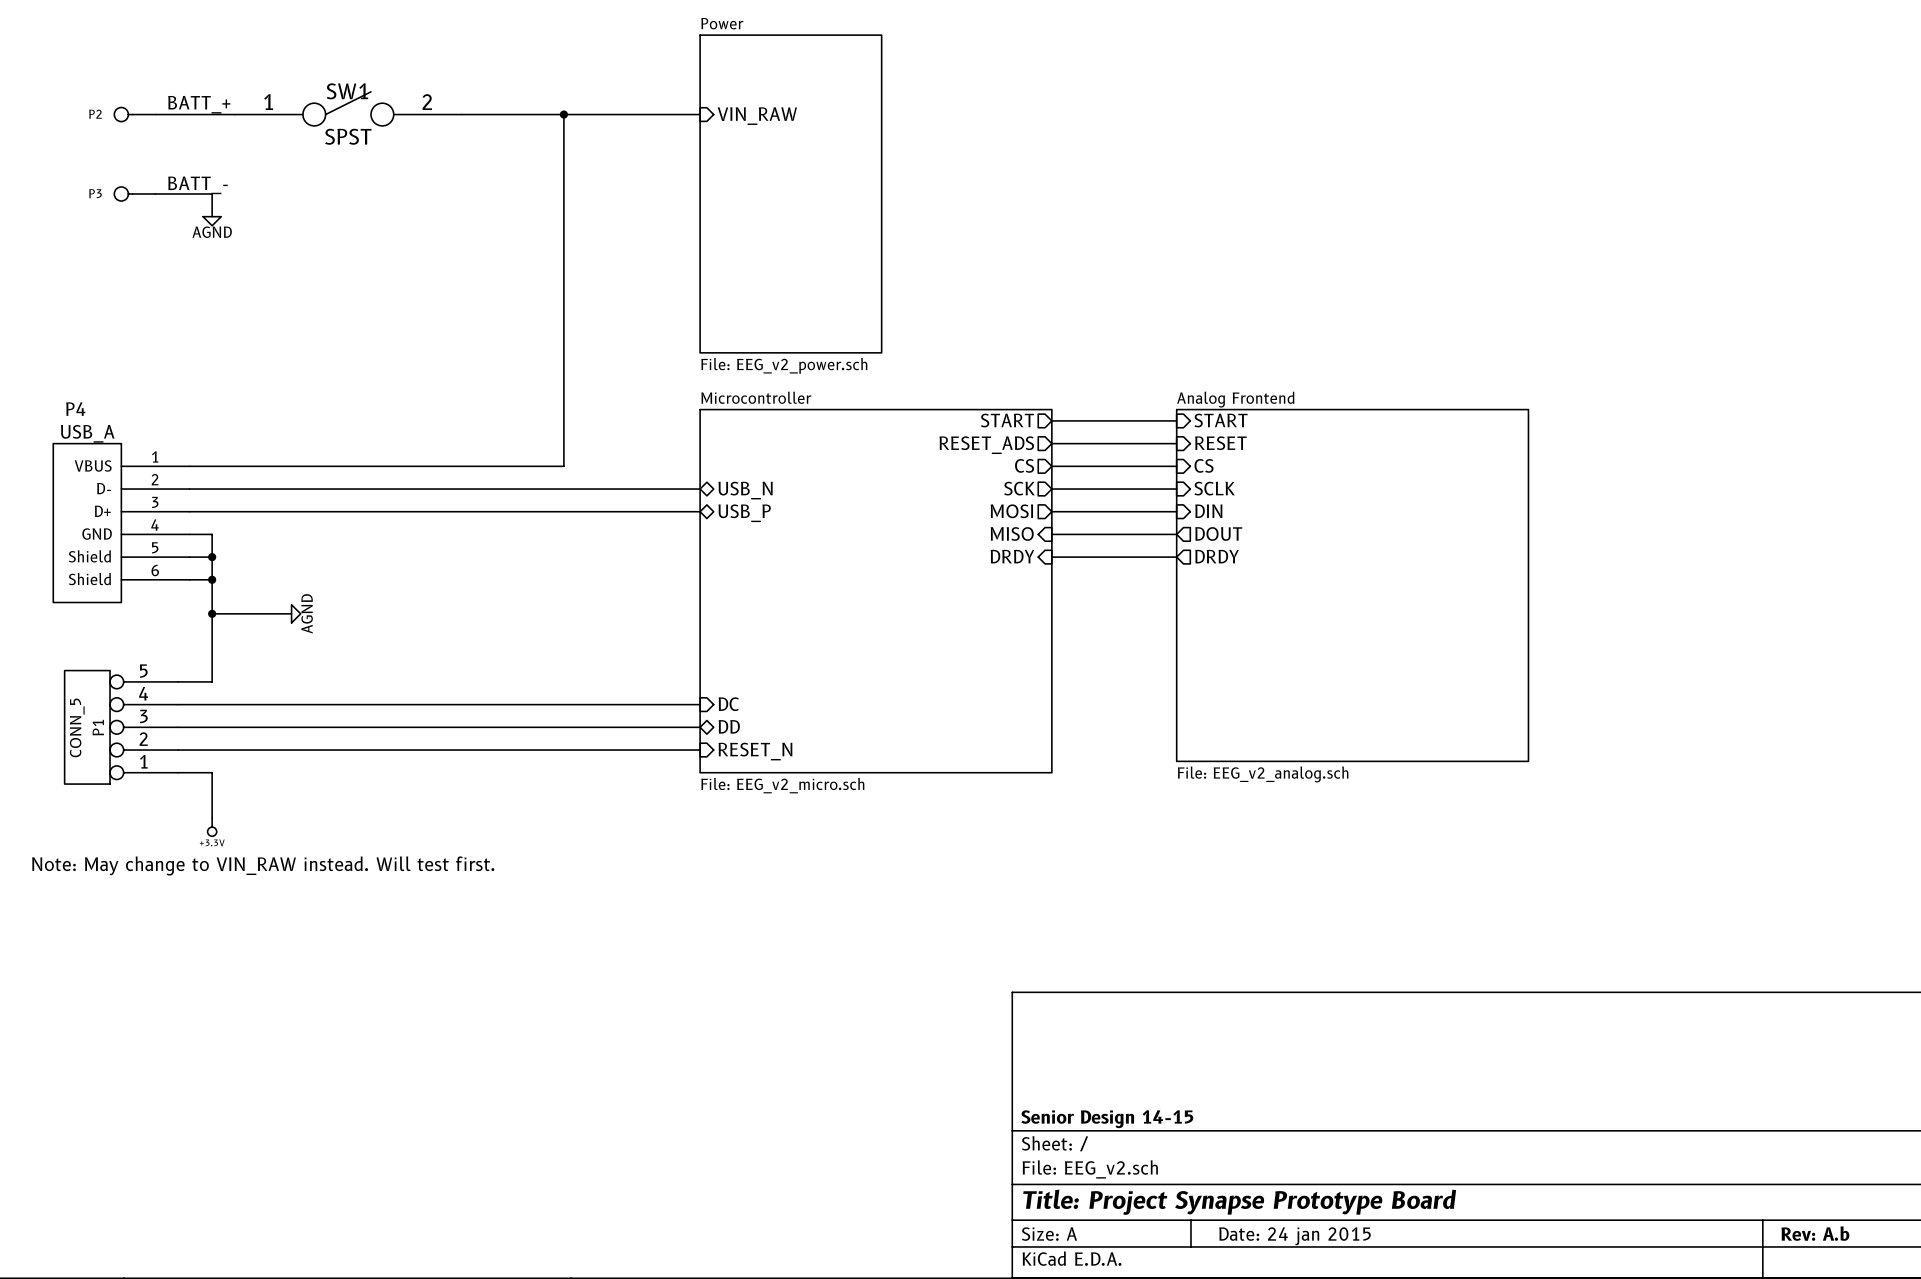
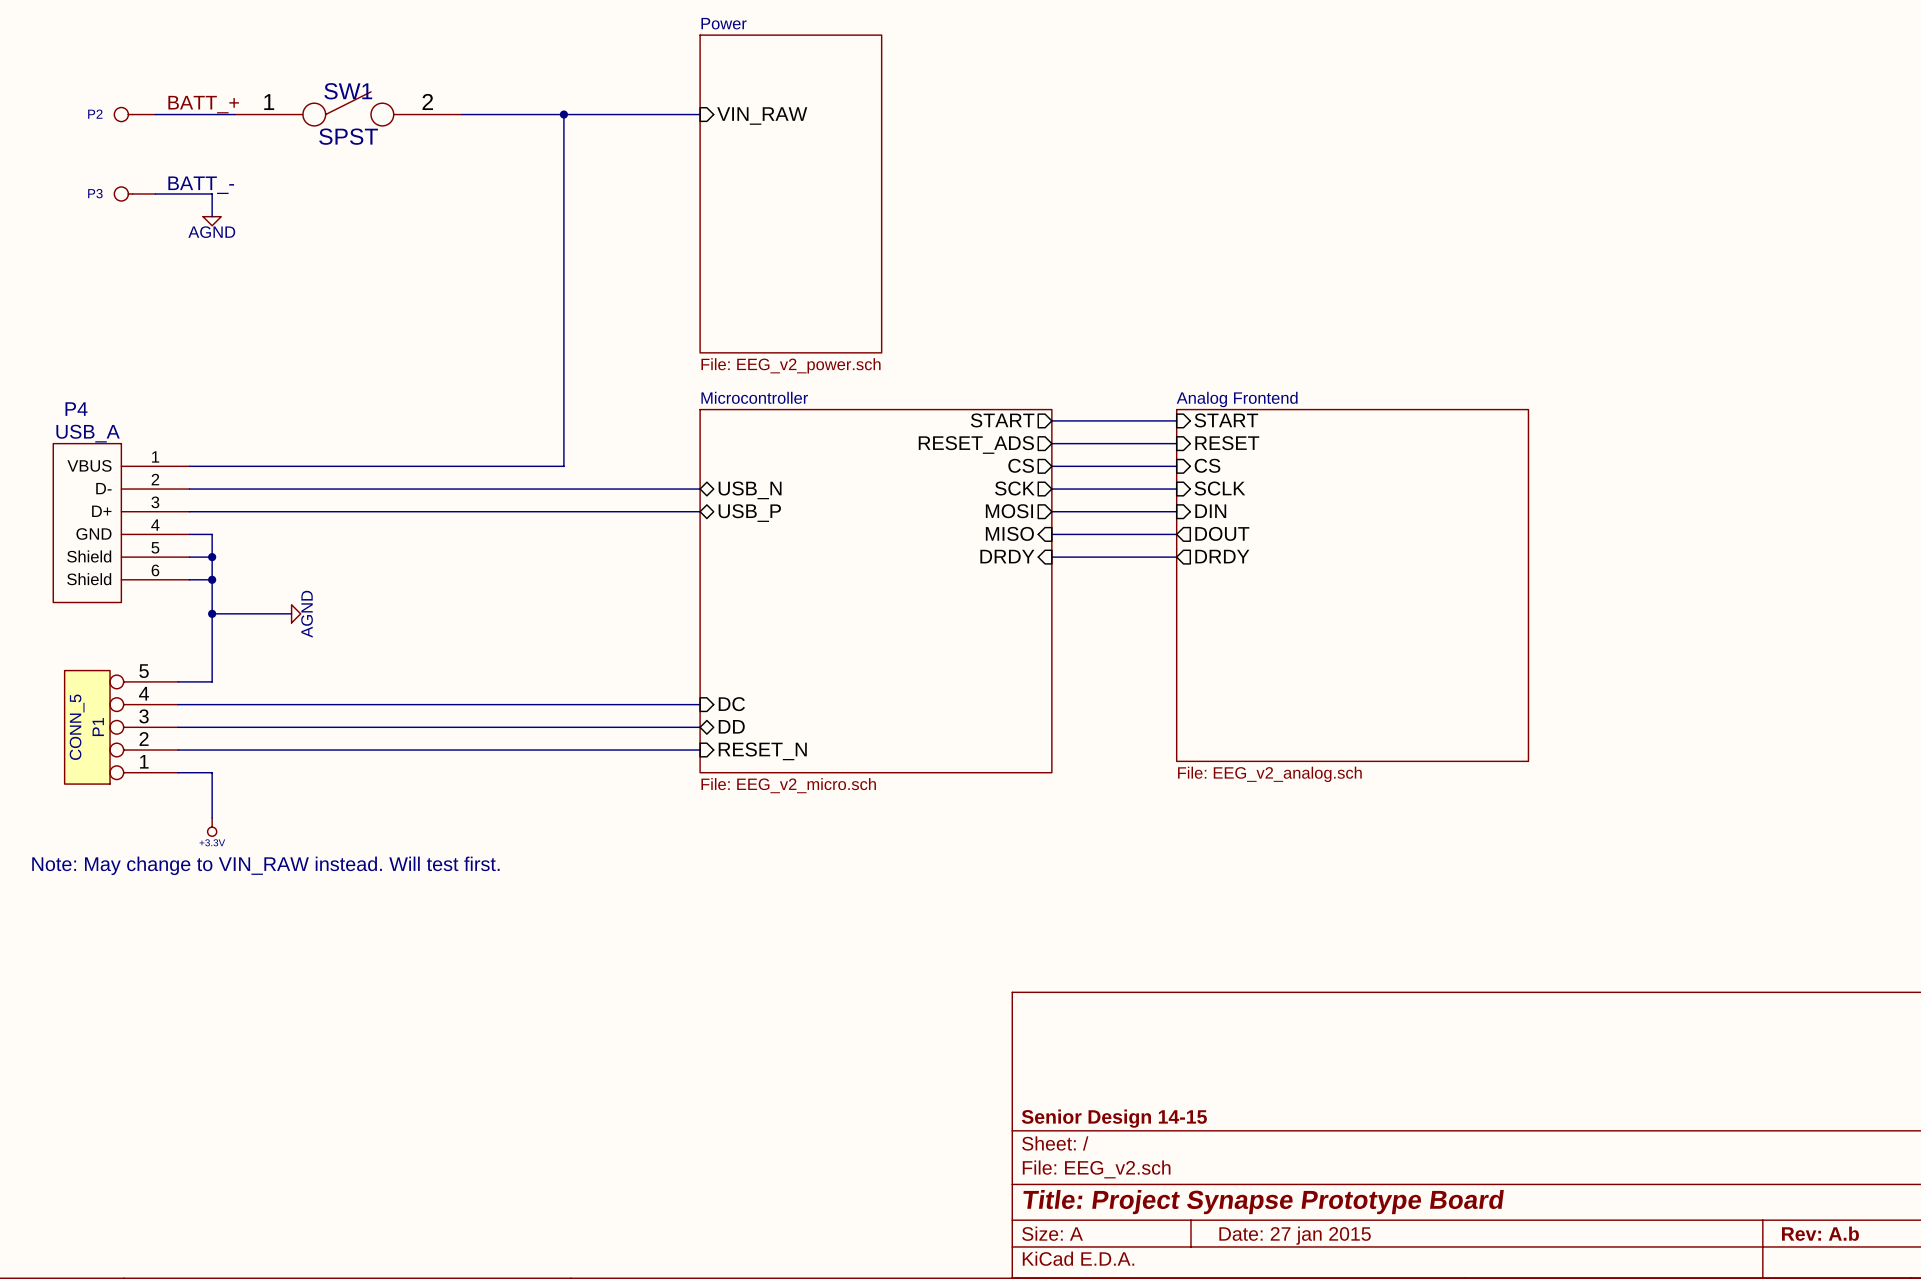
title block: Date: 24 jan 2015 (1295, 1236) -> Date: 27 jan 2015 (1295, 1235)

